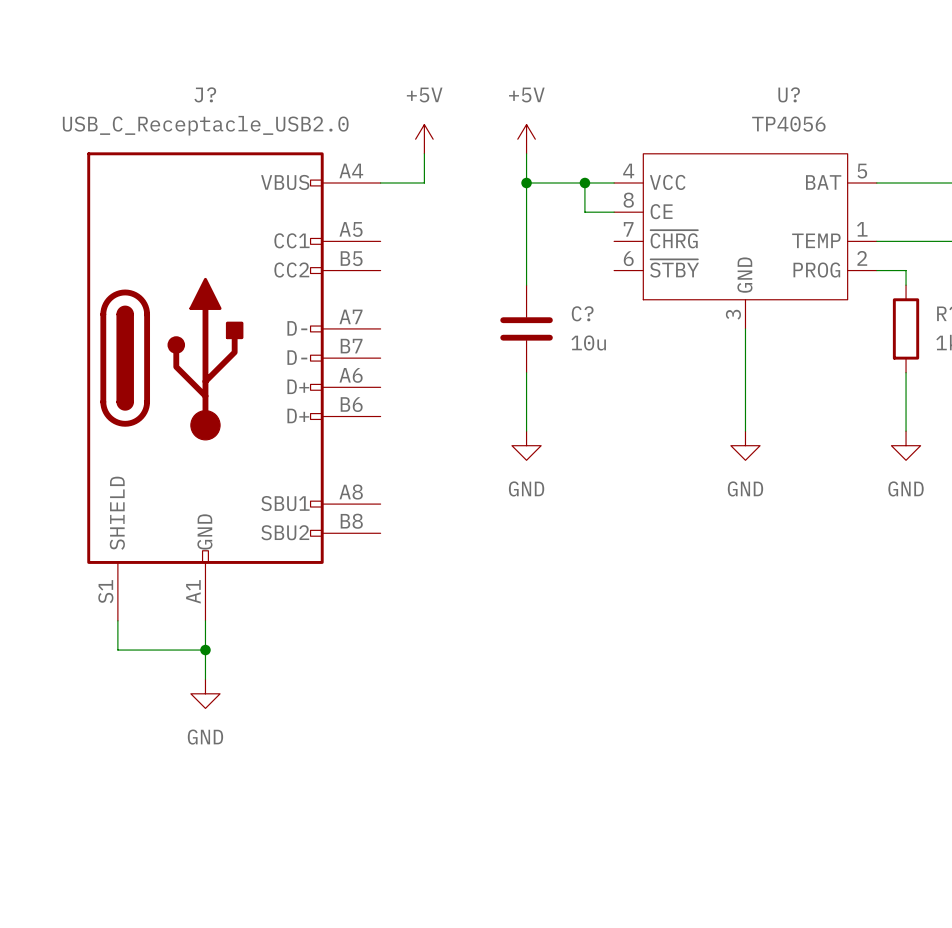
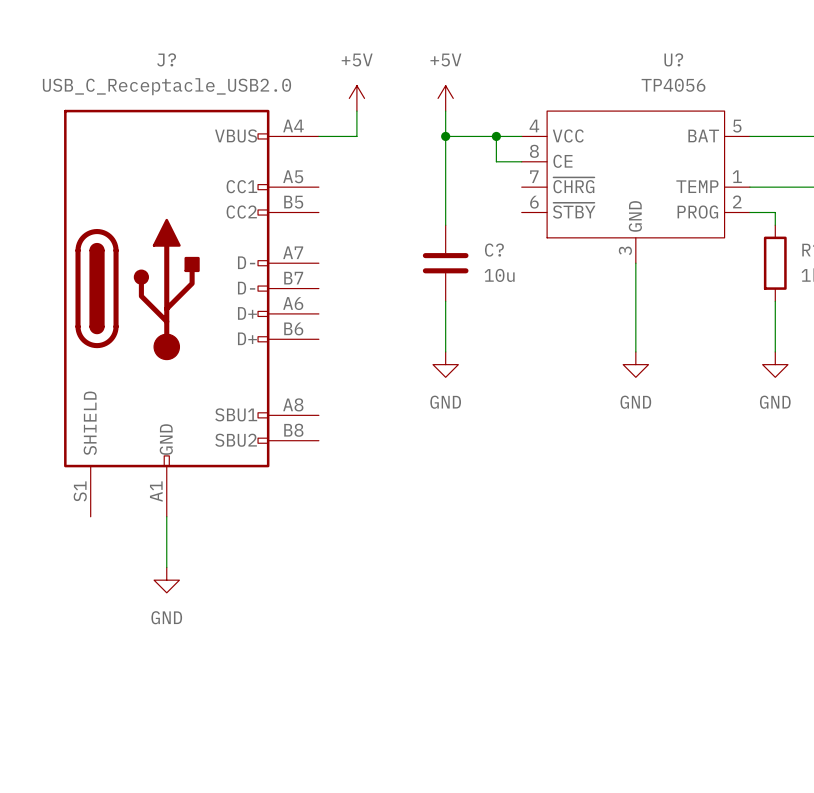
wire: (117, 620) (117, 650) (205, 650) -> none
junction: (205, 650) -> none

